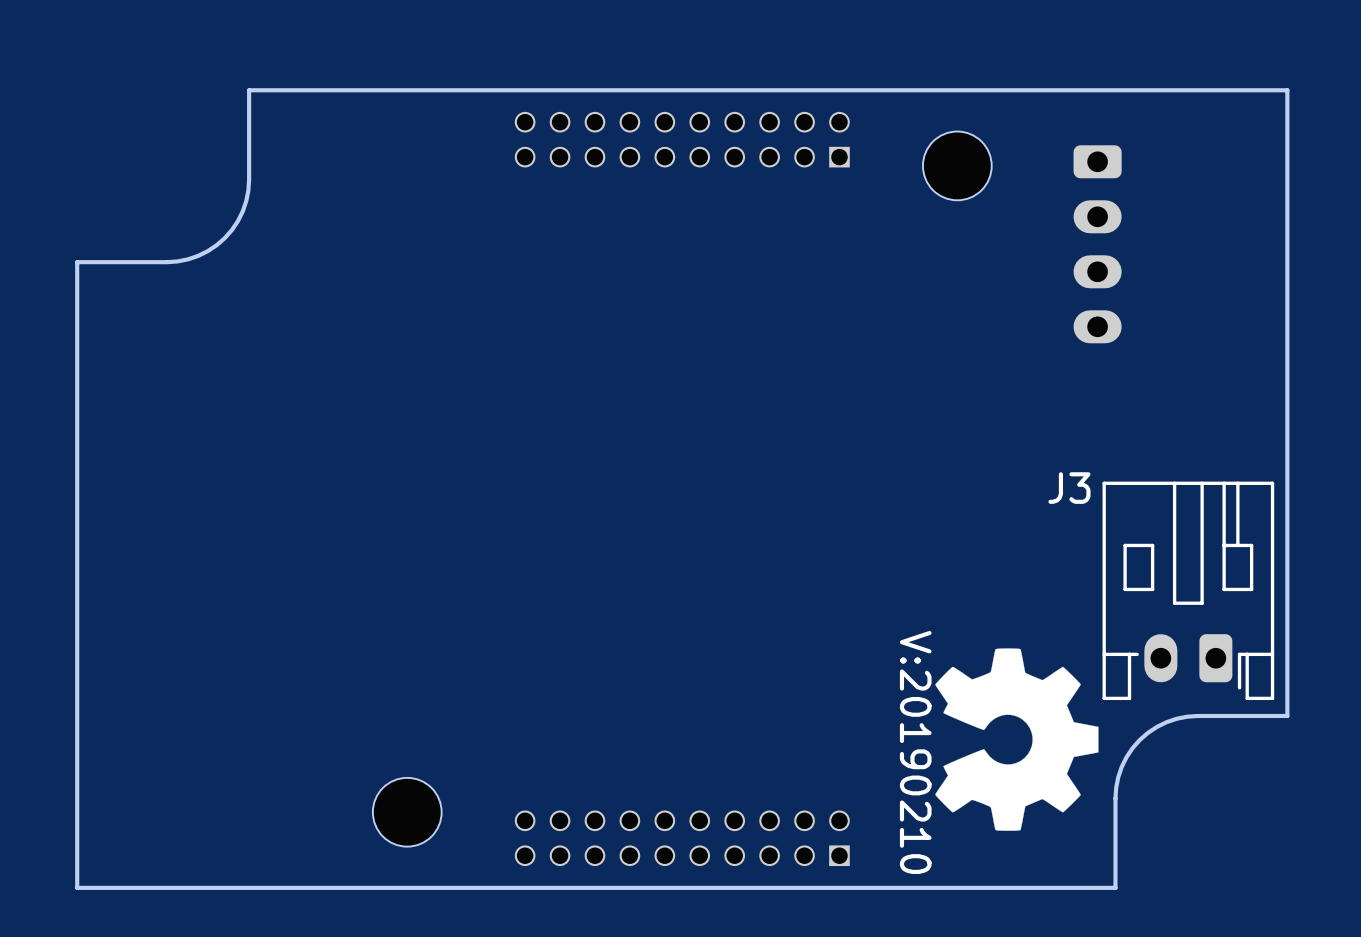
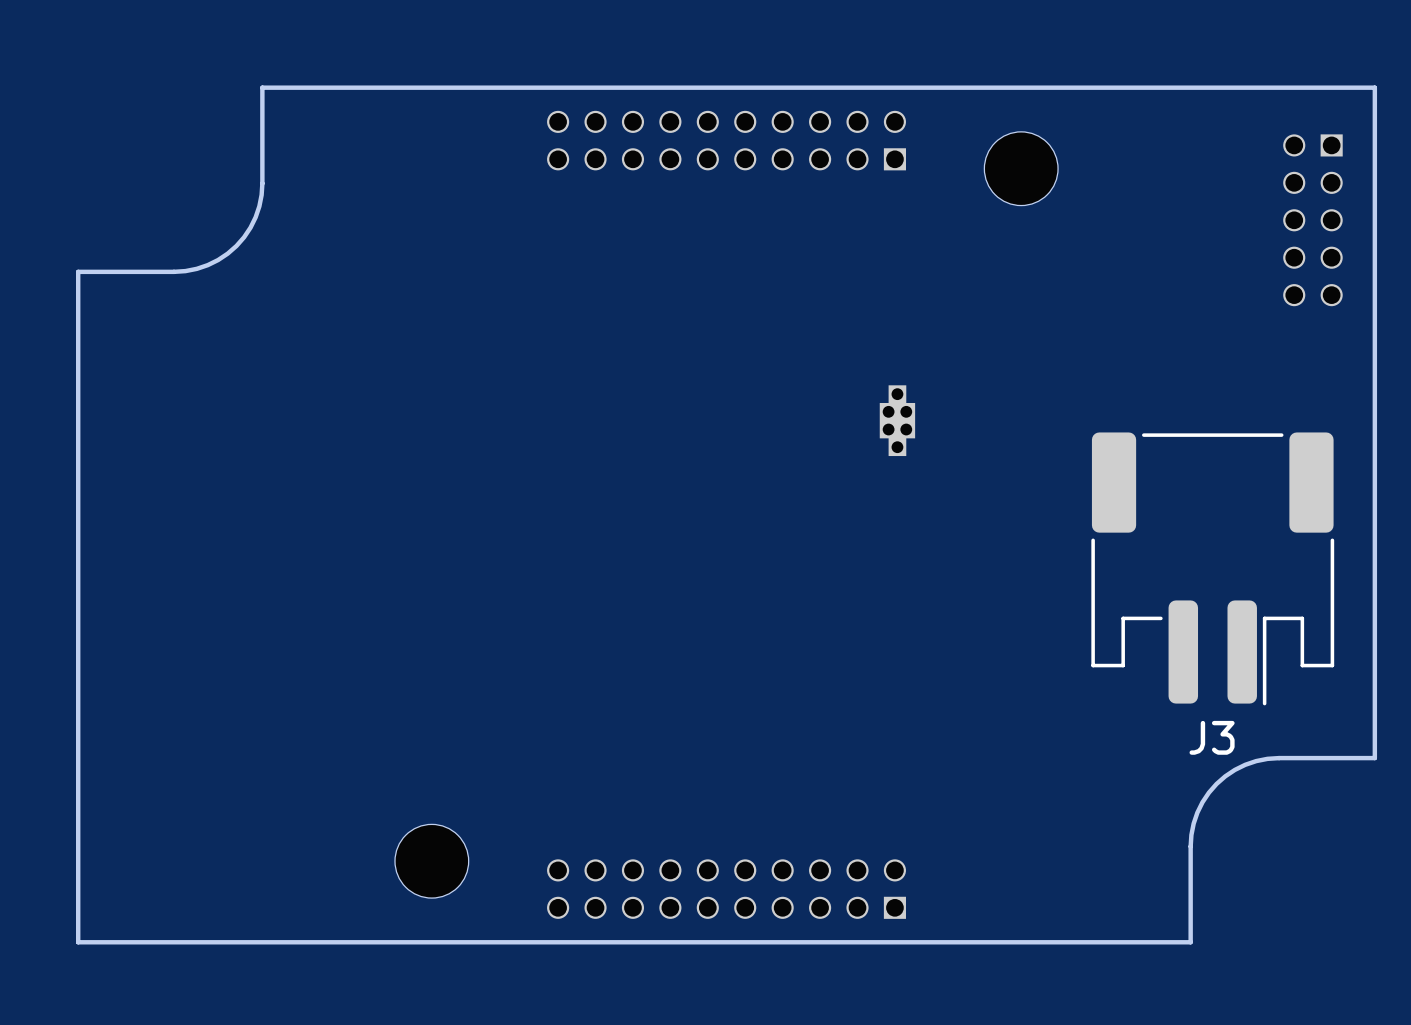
part: none -> (1312, 220)
part: (1097, 244) -> none
part: none -> (897, 420)
J3 footprint: [1102, 481, 1275, 701] -> [1091, 432, 1335, 706]
J3 name position: J3 (1069, 488) -> J3 (1212, 737)
drawing: [935, 648, 1099, 831] -> none

